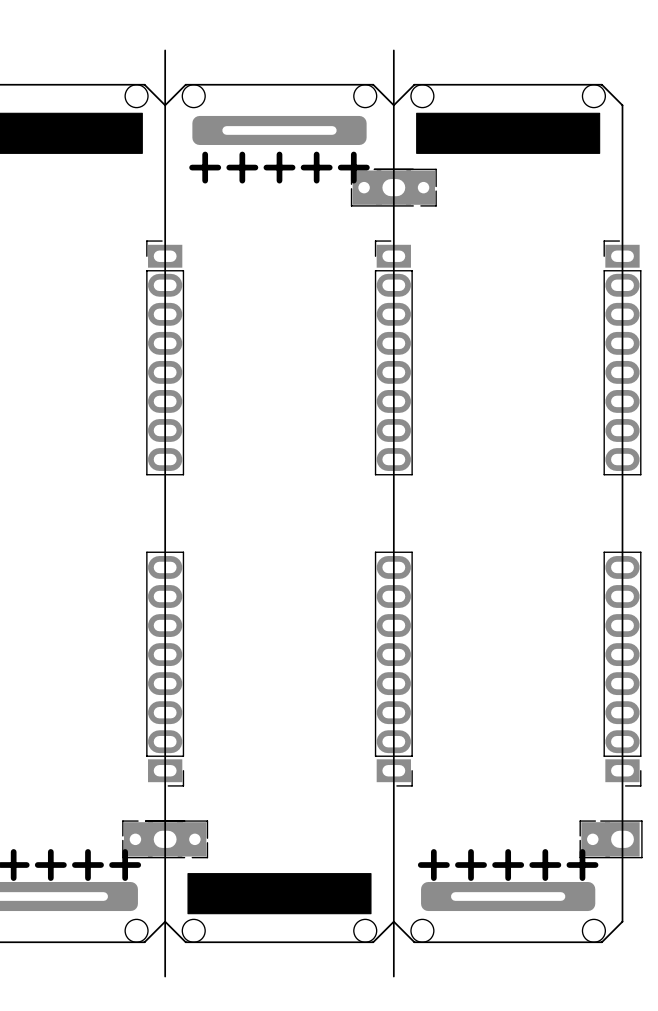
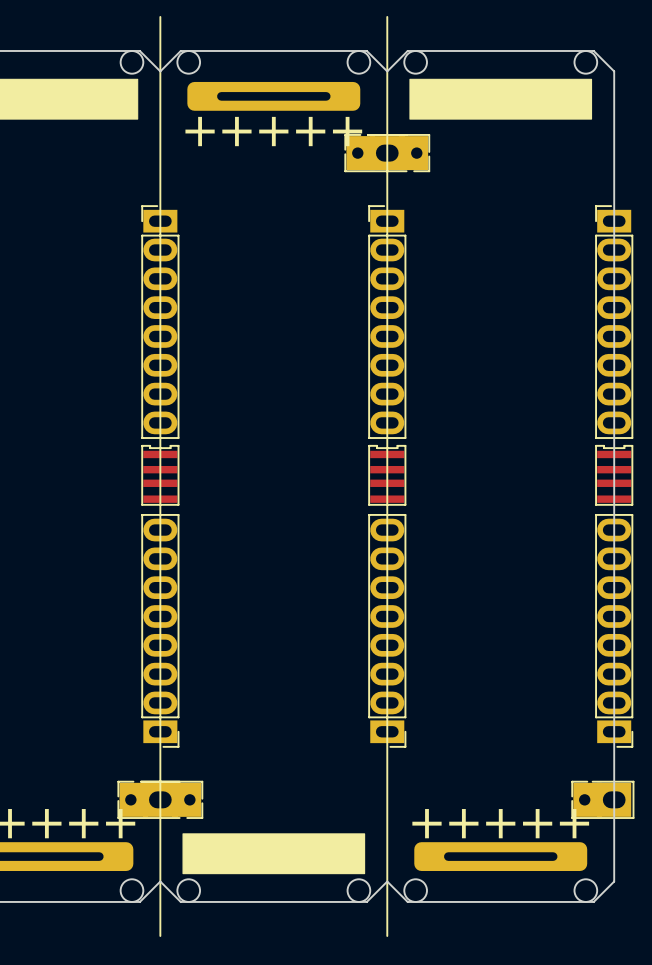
part: none -> (160, 475)
part: none -> (387, 475)
part: none -> (614, 475)

